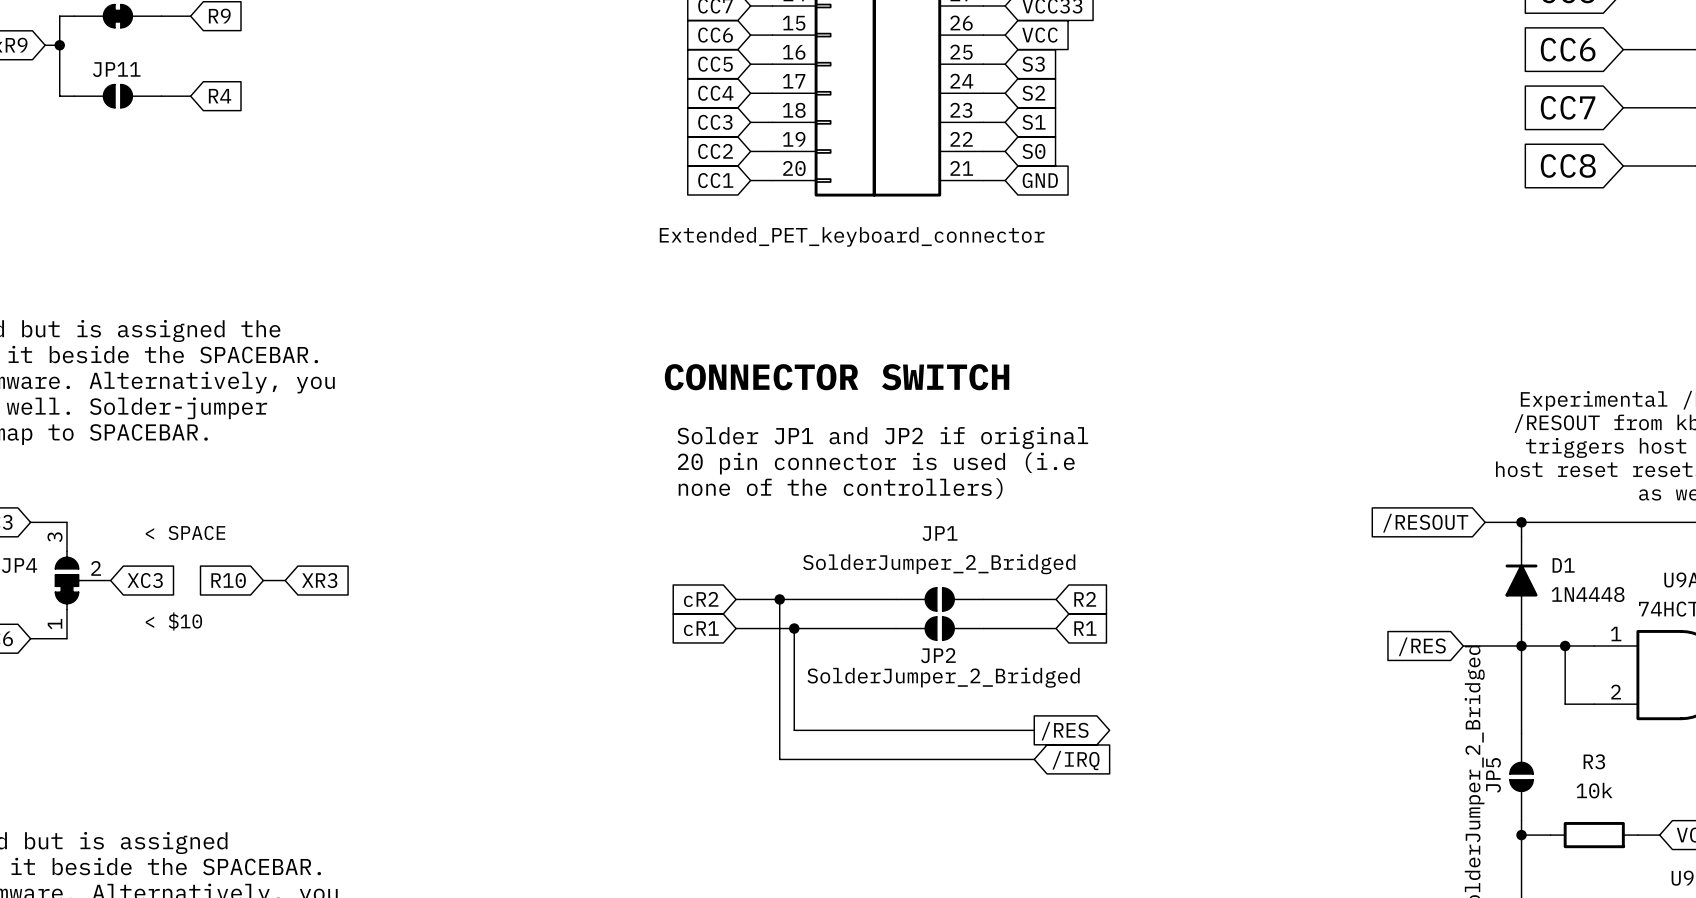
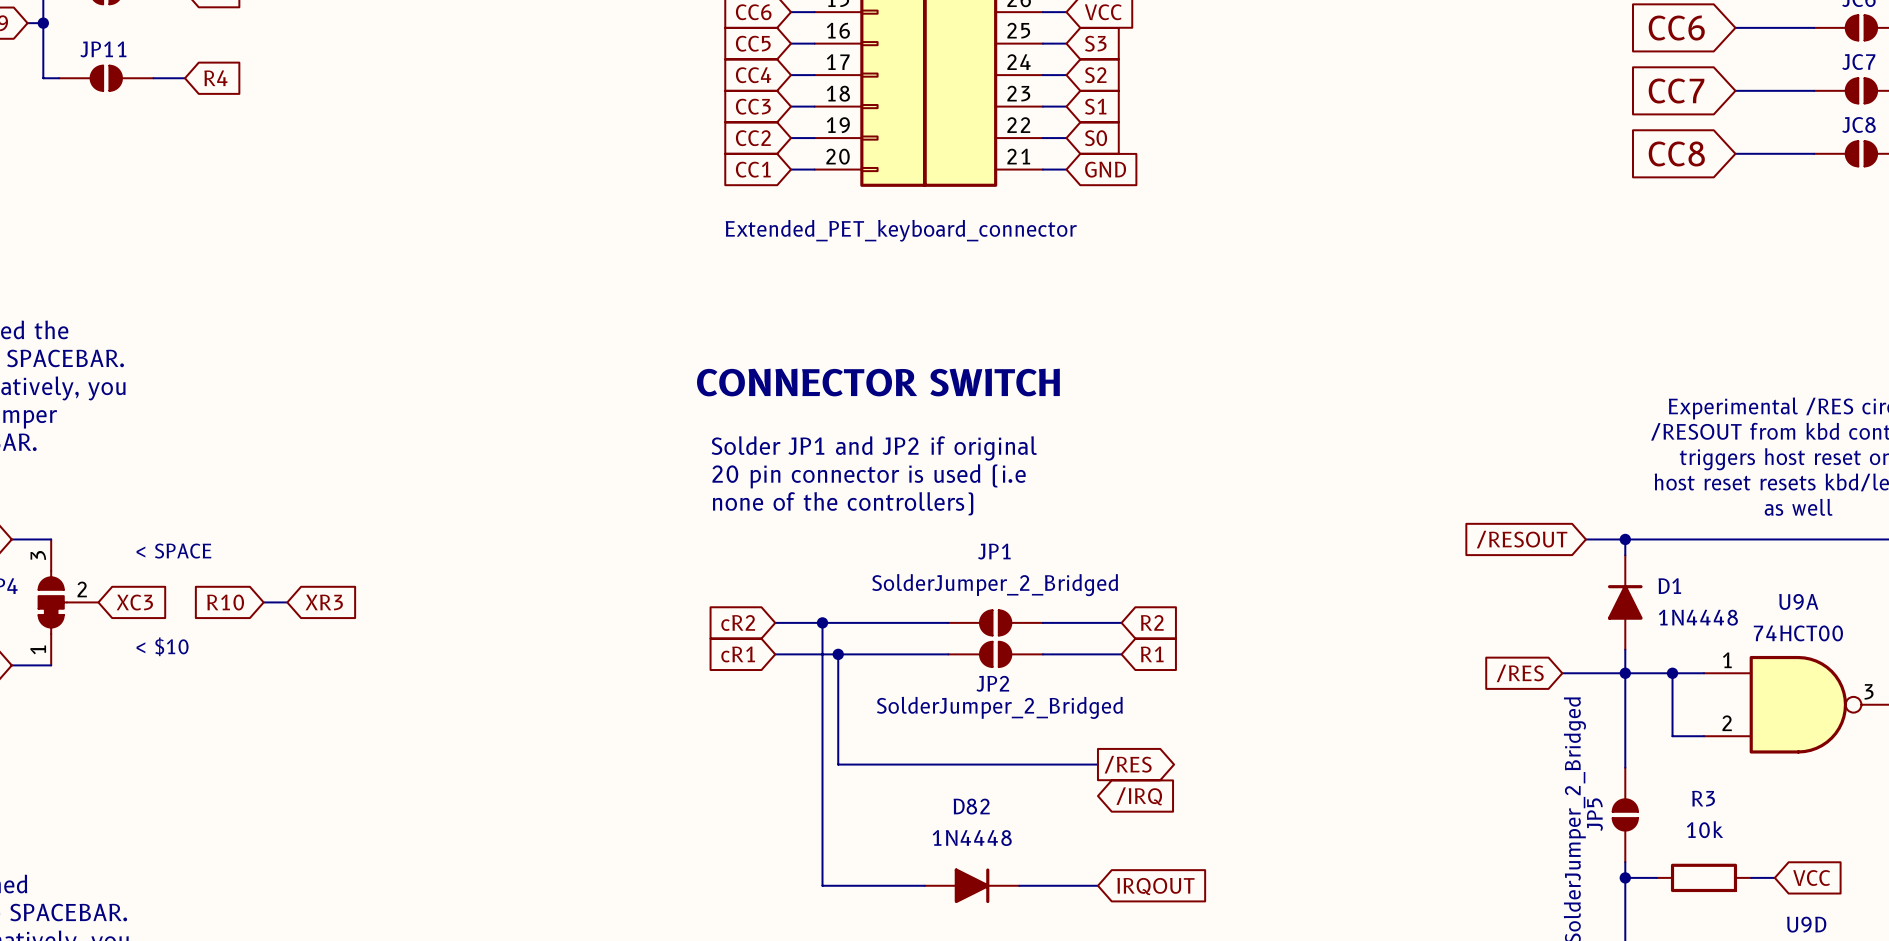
wire: (779, 759) (1034, 759) -> (822, 796) (822, 885) (924, 885)
D82: none -> 1N4448 (972, 885)
wire: none -> (1019, 885) (1097, 885)
global label: none -> IRQOUT (1155, 886)

